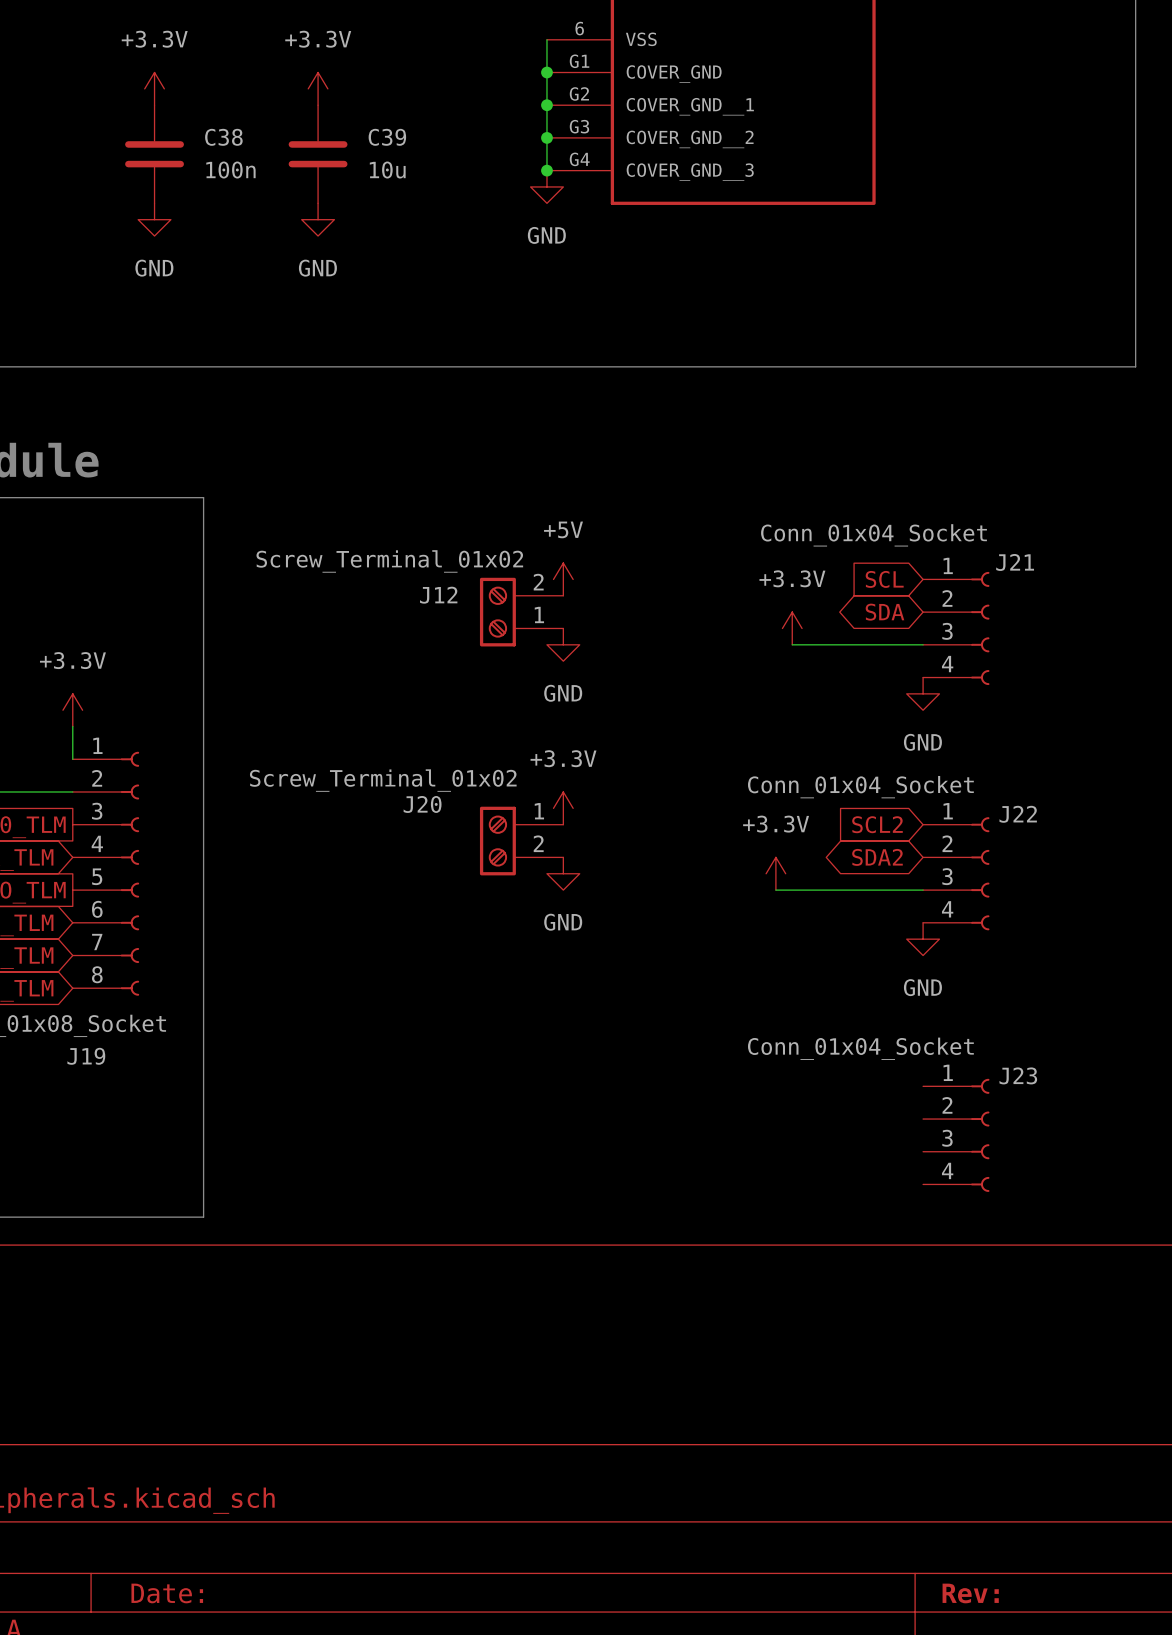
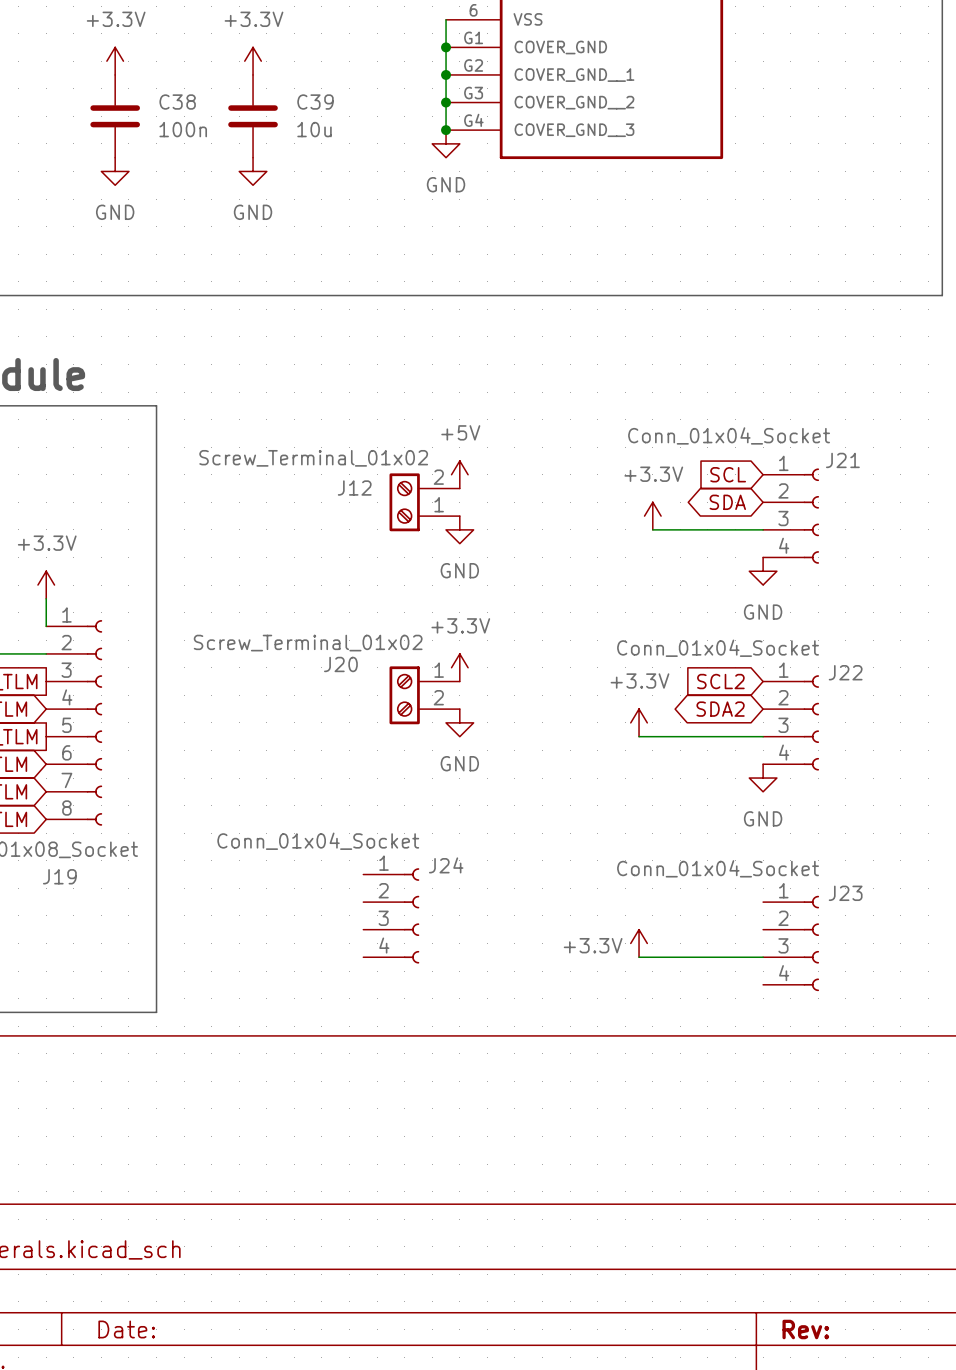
J24: none -> Conn_01x04_Socket (391, 915)
power symbol: none -> +3.3V (639, 943)
wire: none -> (639, 957) (763, 957)

